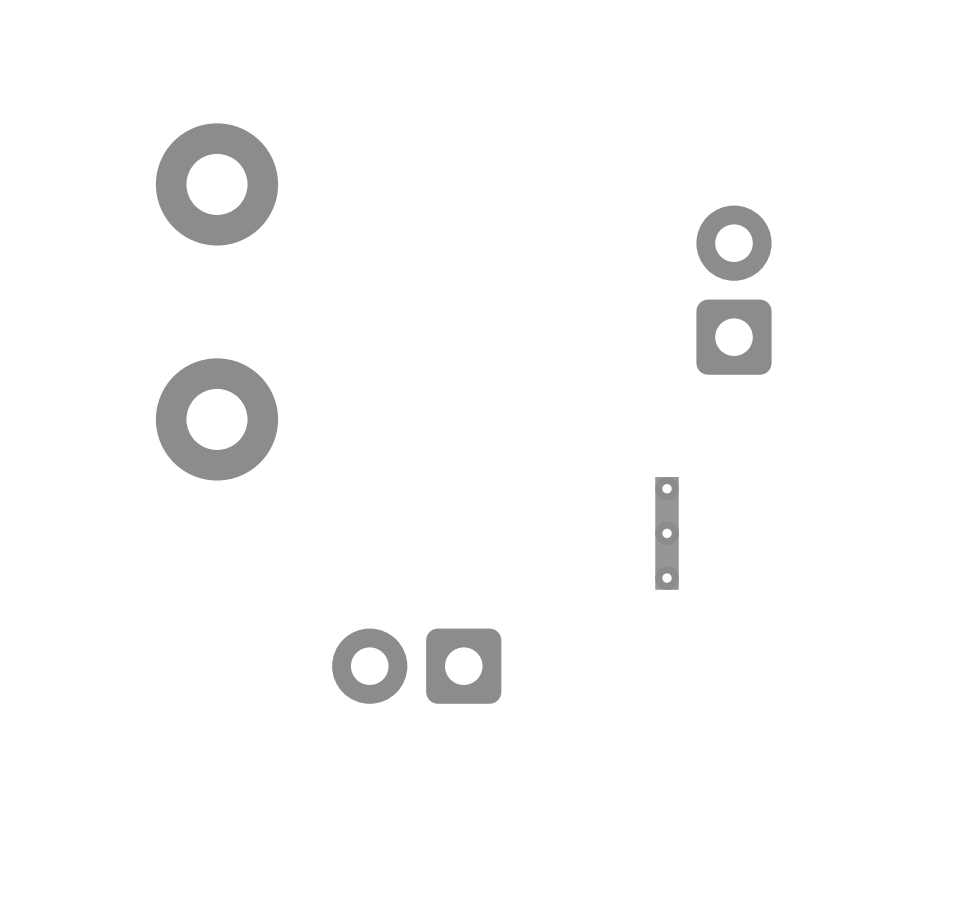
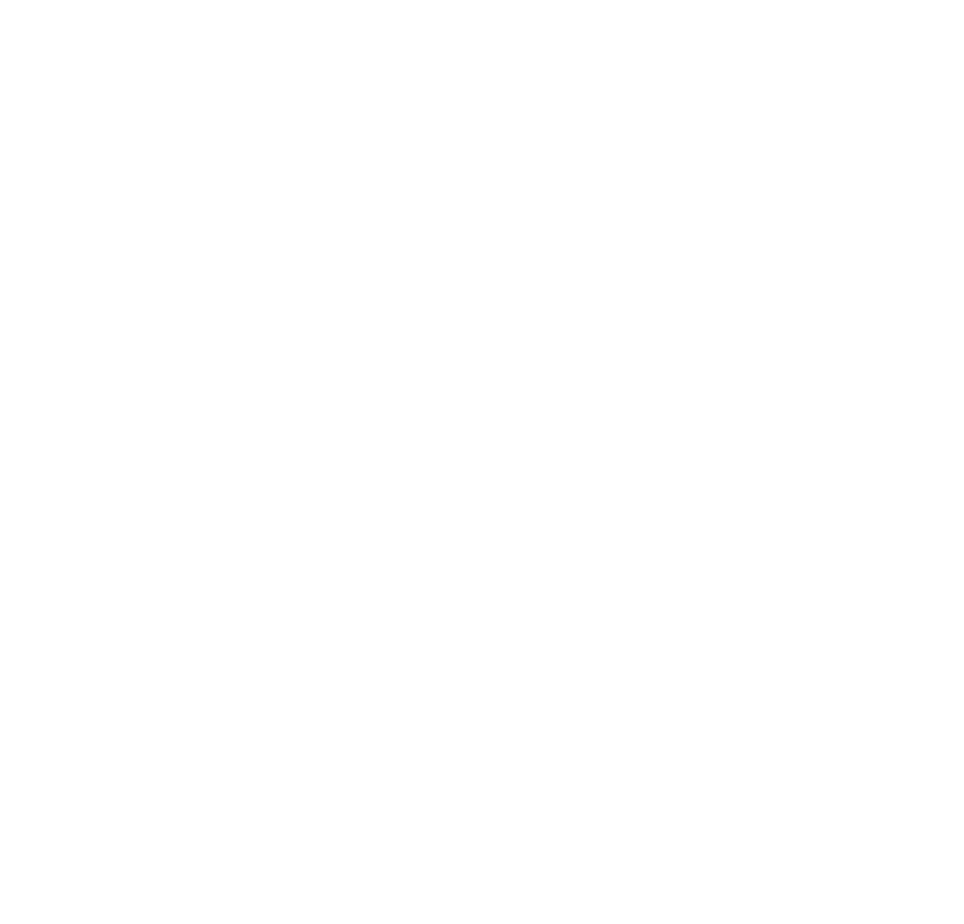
part: (733, 290) -> none
part: (216, 301) -> none
part: (667, 533) -> none
part: (416, 666) -> none

